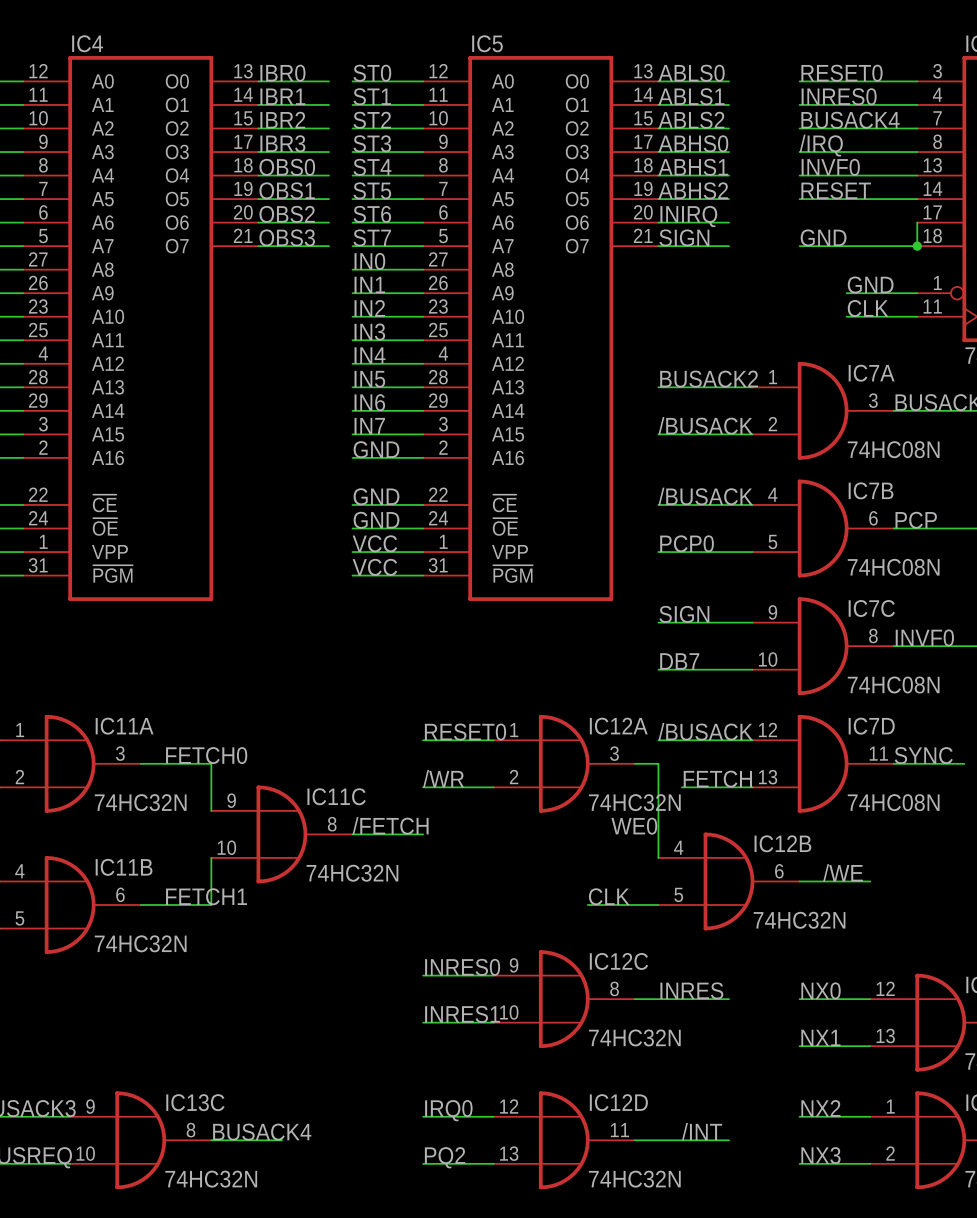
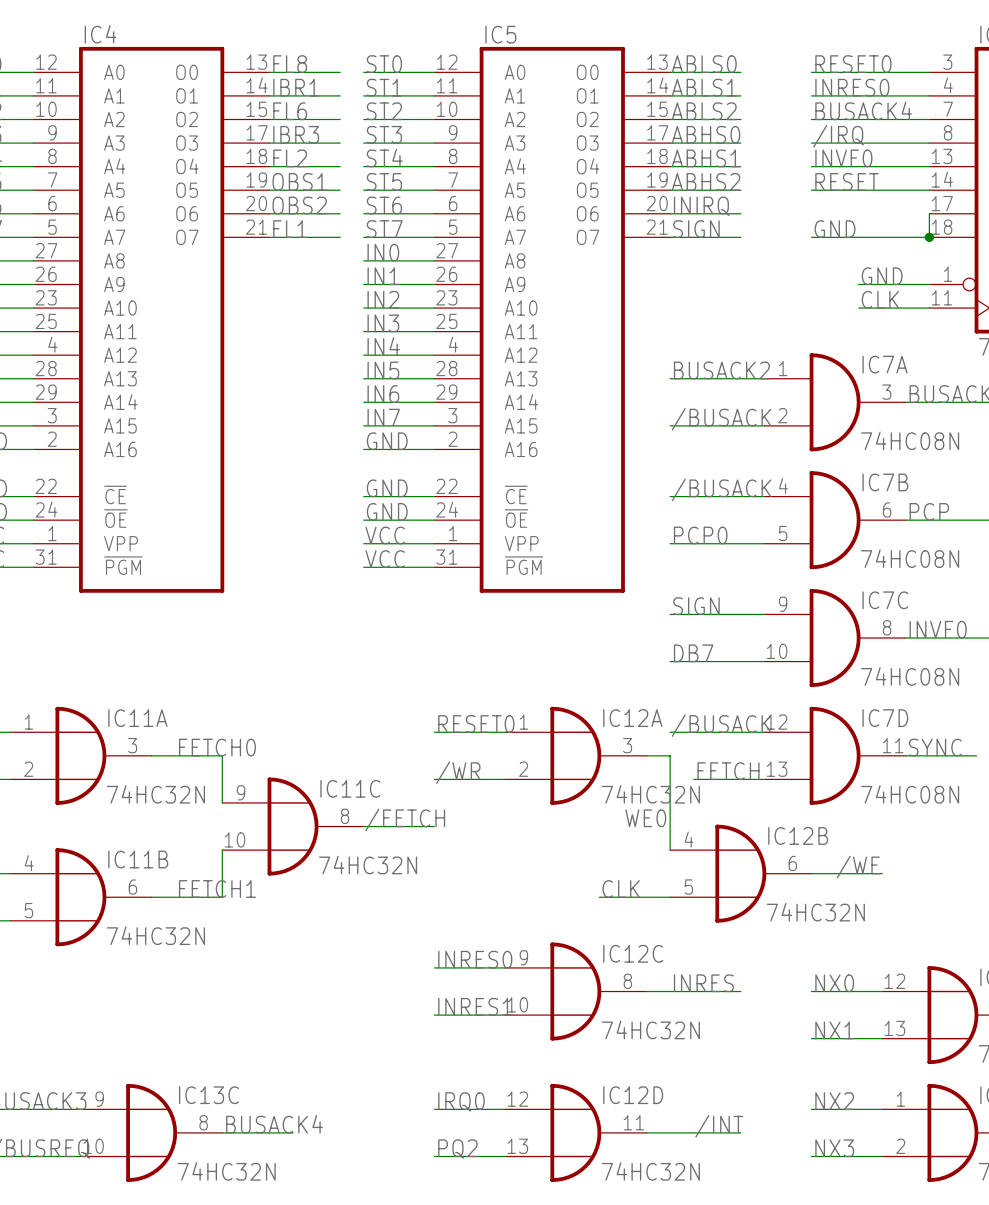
label: IBR0 (282, 73) -> FL8 (290, 64)
label: IBR2 (282, 120) -> FL6 (290, 111)
label: OBS0 (287, 167) -> FL2 (290, 158)
label: OBS3 (287, 237) -> FL1 (290, 229)

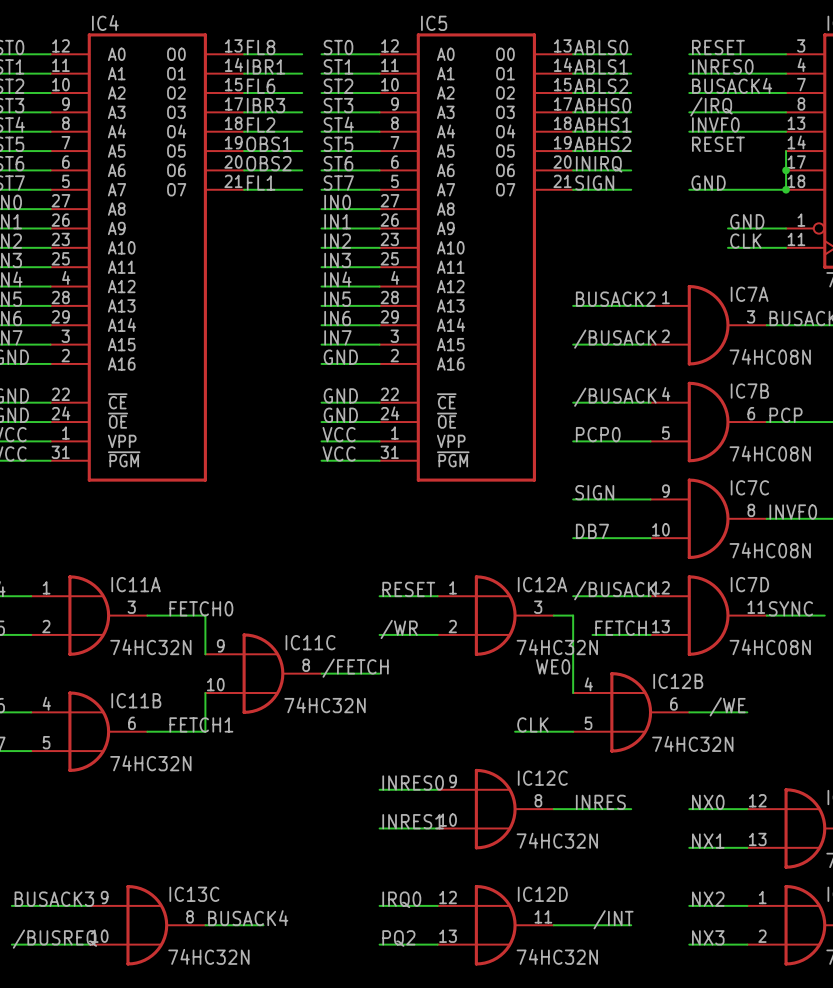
label: RESET0 (853, 64) -> RESET (718, 47)
wire: (811, 190) (929, 190) -> (786, 170) (786, 151)
junction: none -> (786, 170)
label: RESET0 (476, 724) -> RESET (408, 589)

